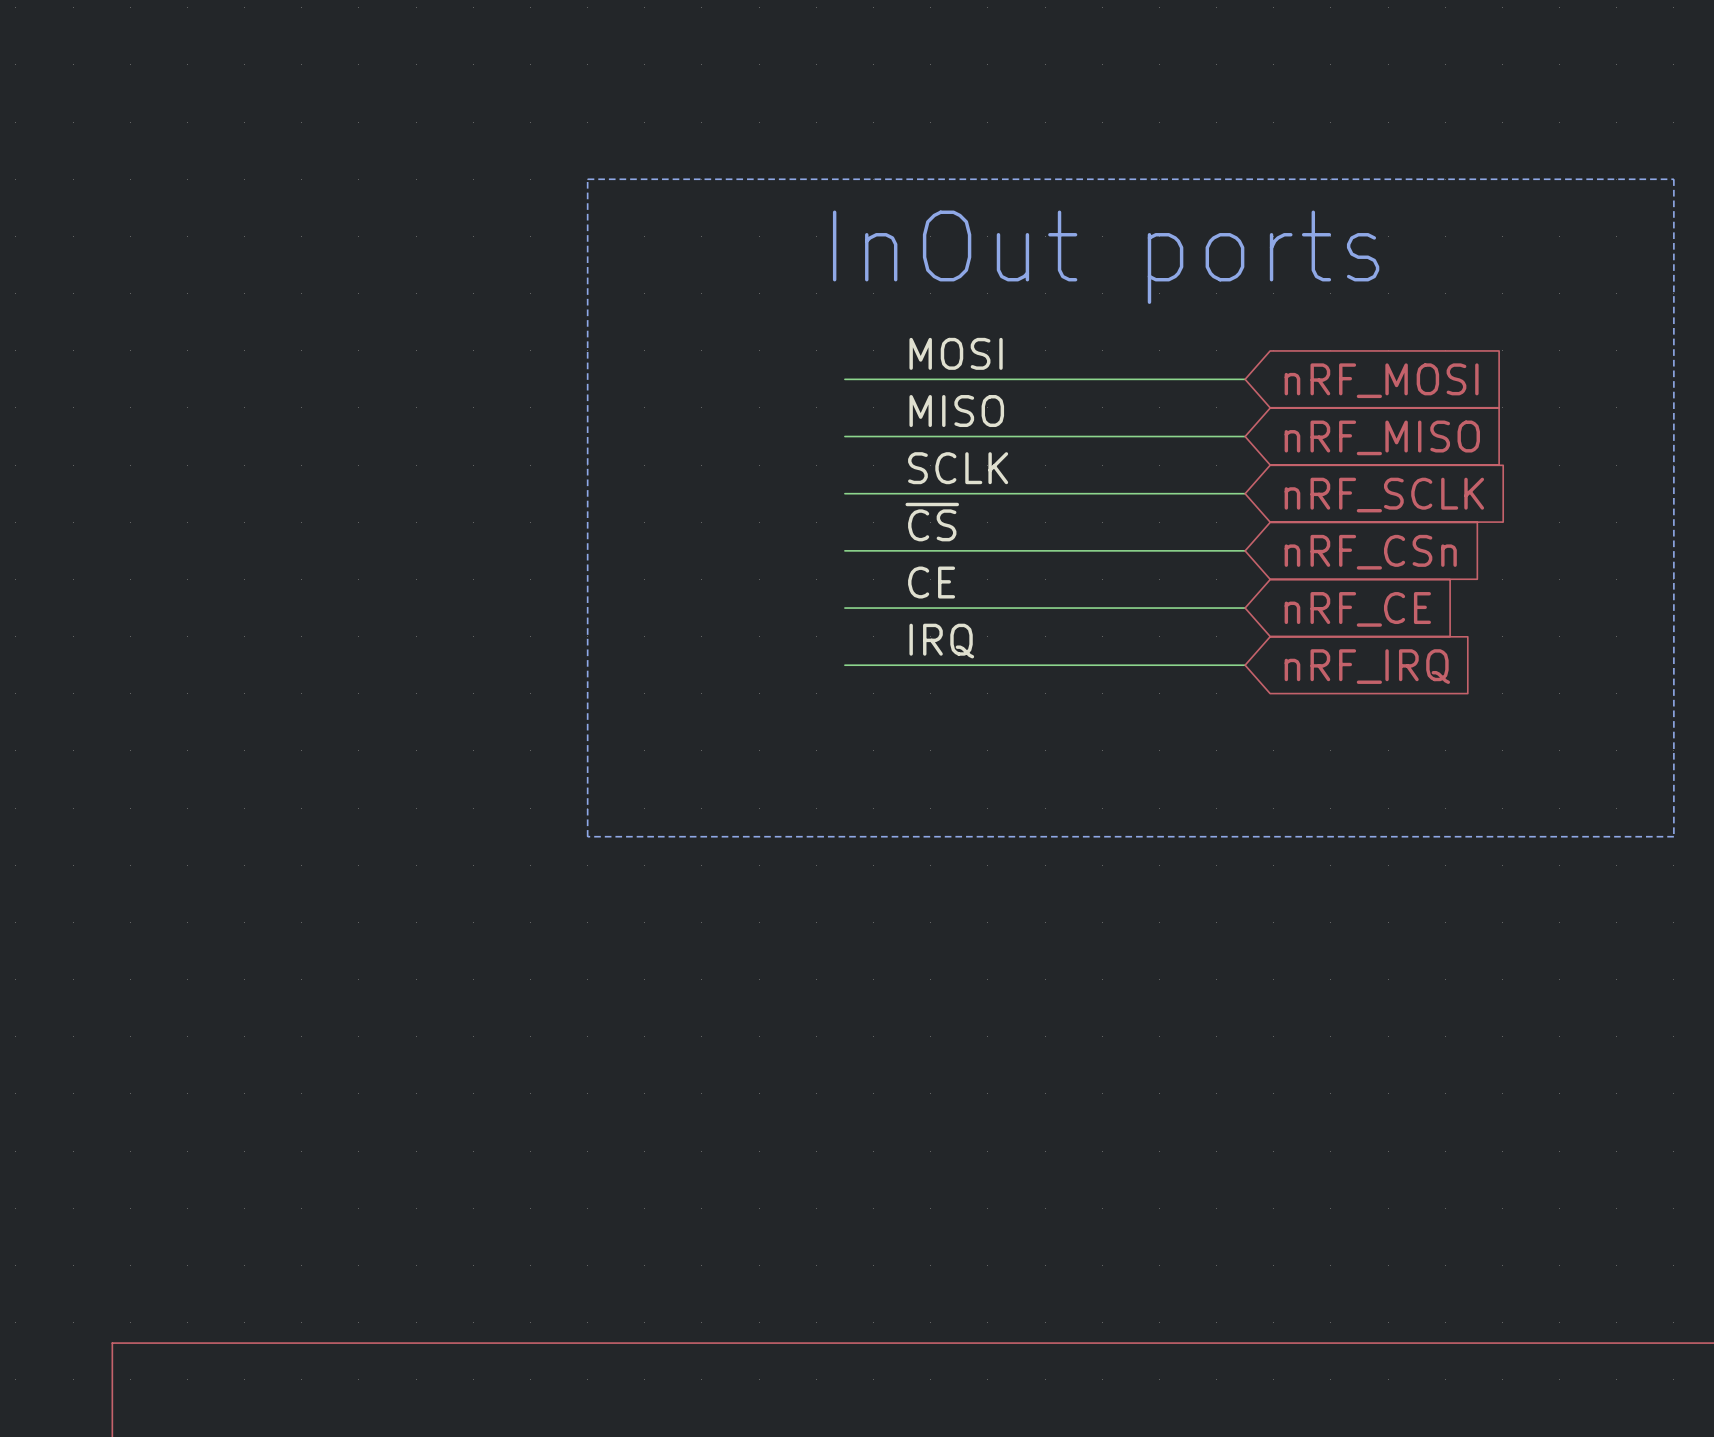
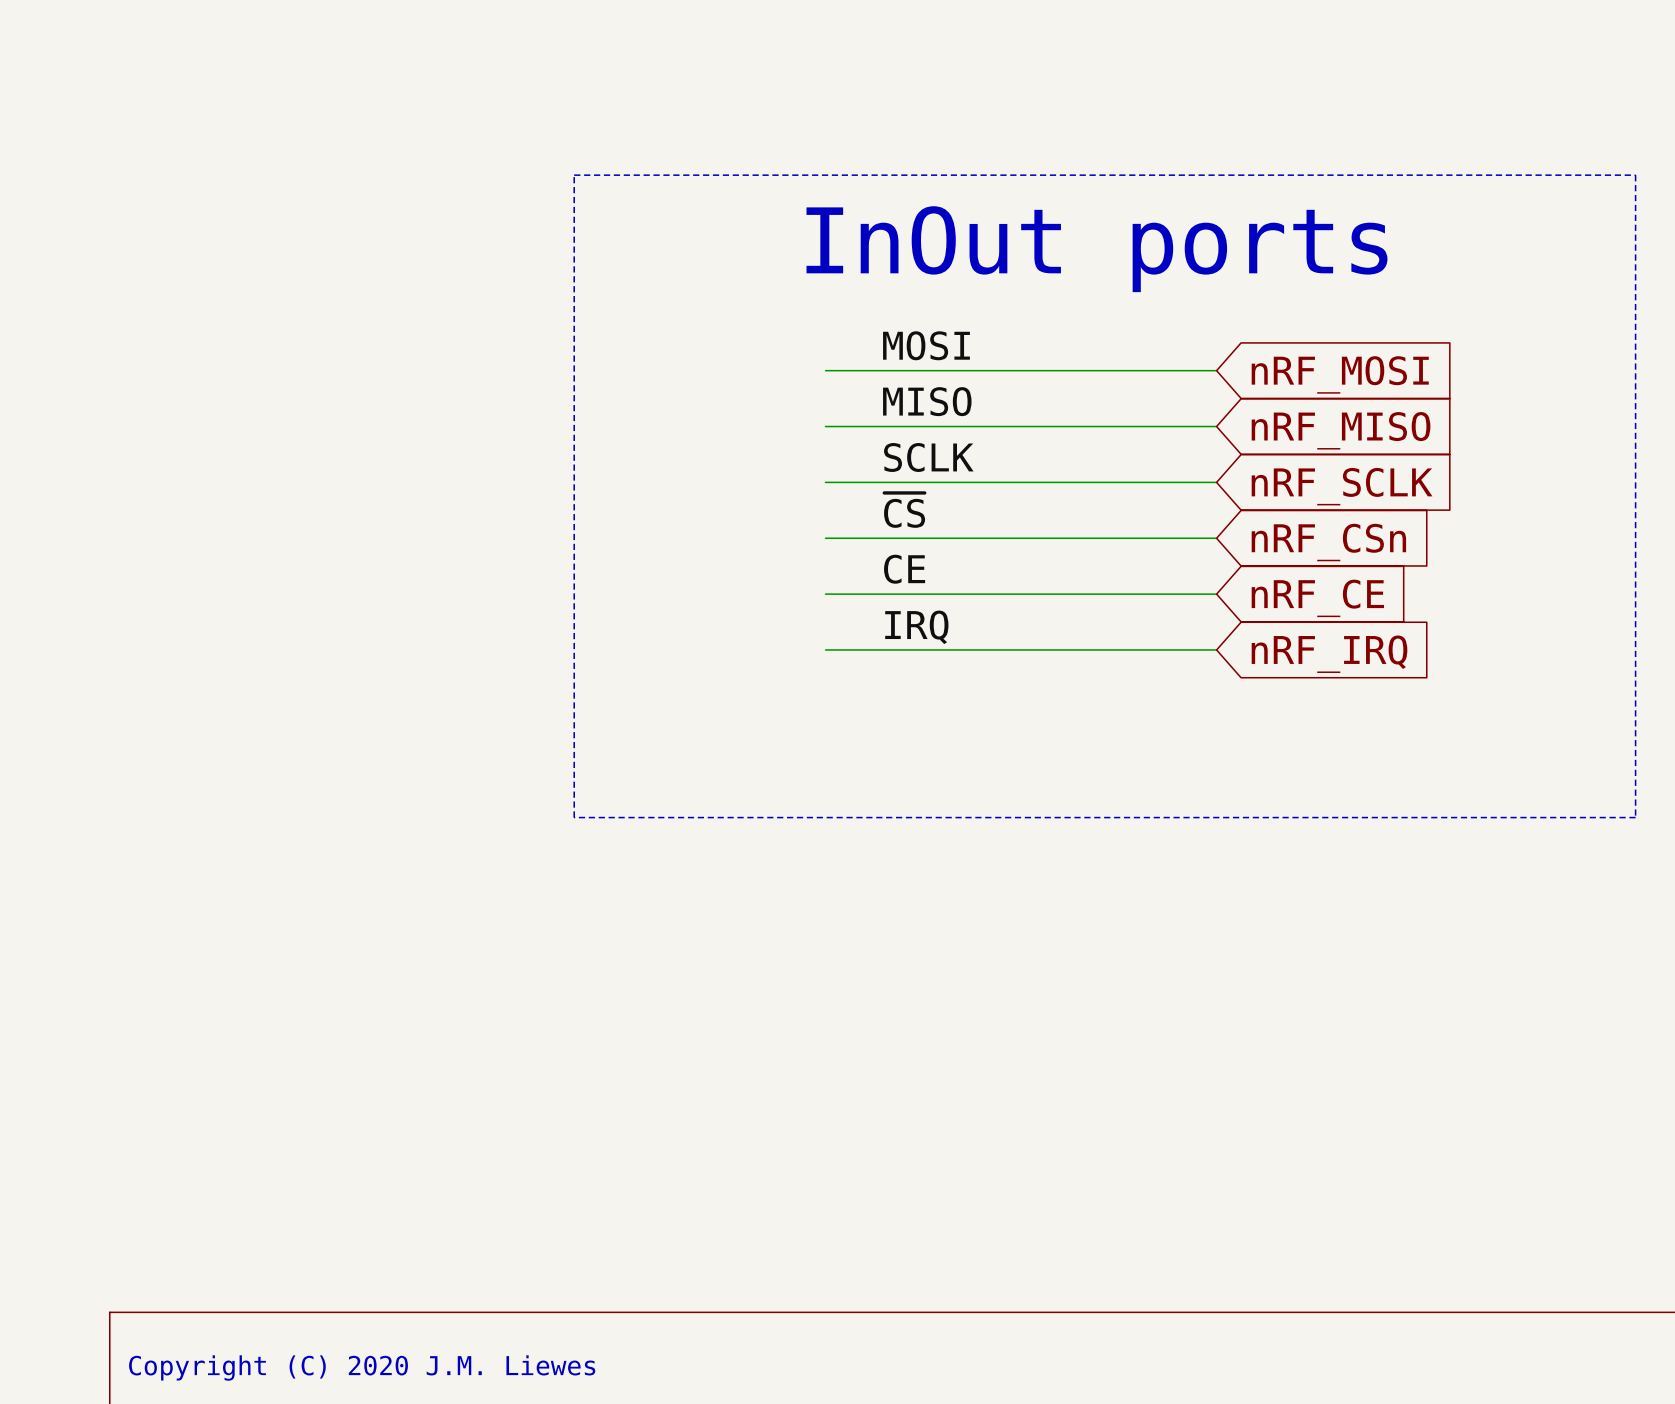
text: none -> Copyright (C) 2020 J.M. Liewes (362, 1368)

